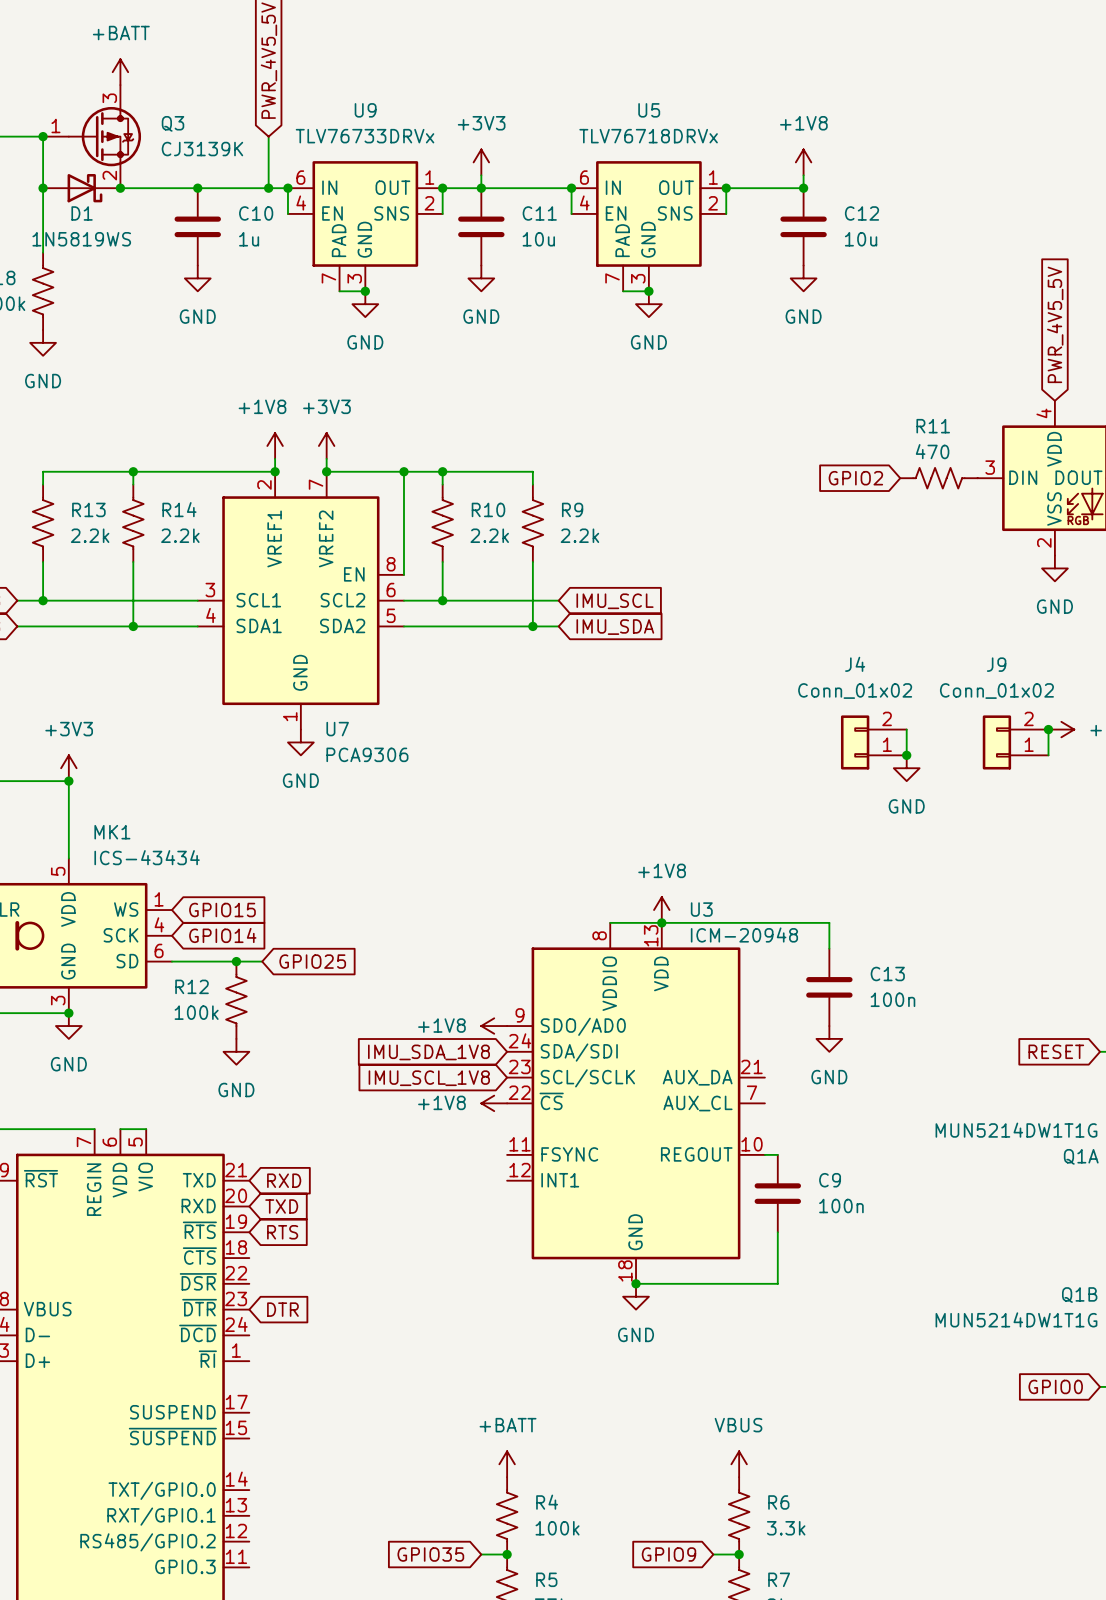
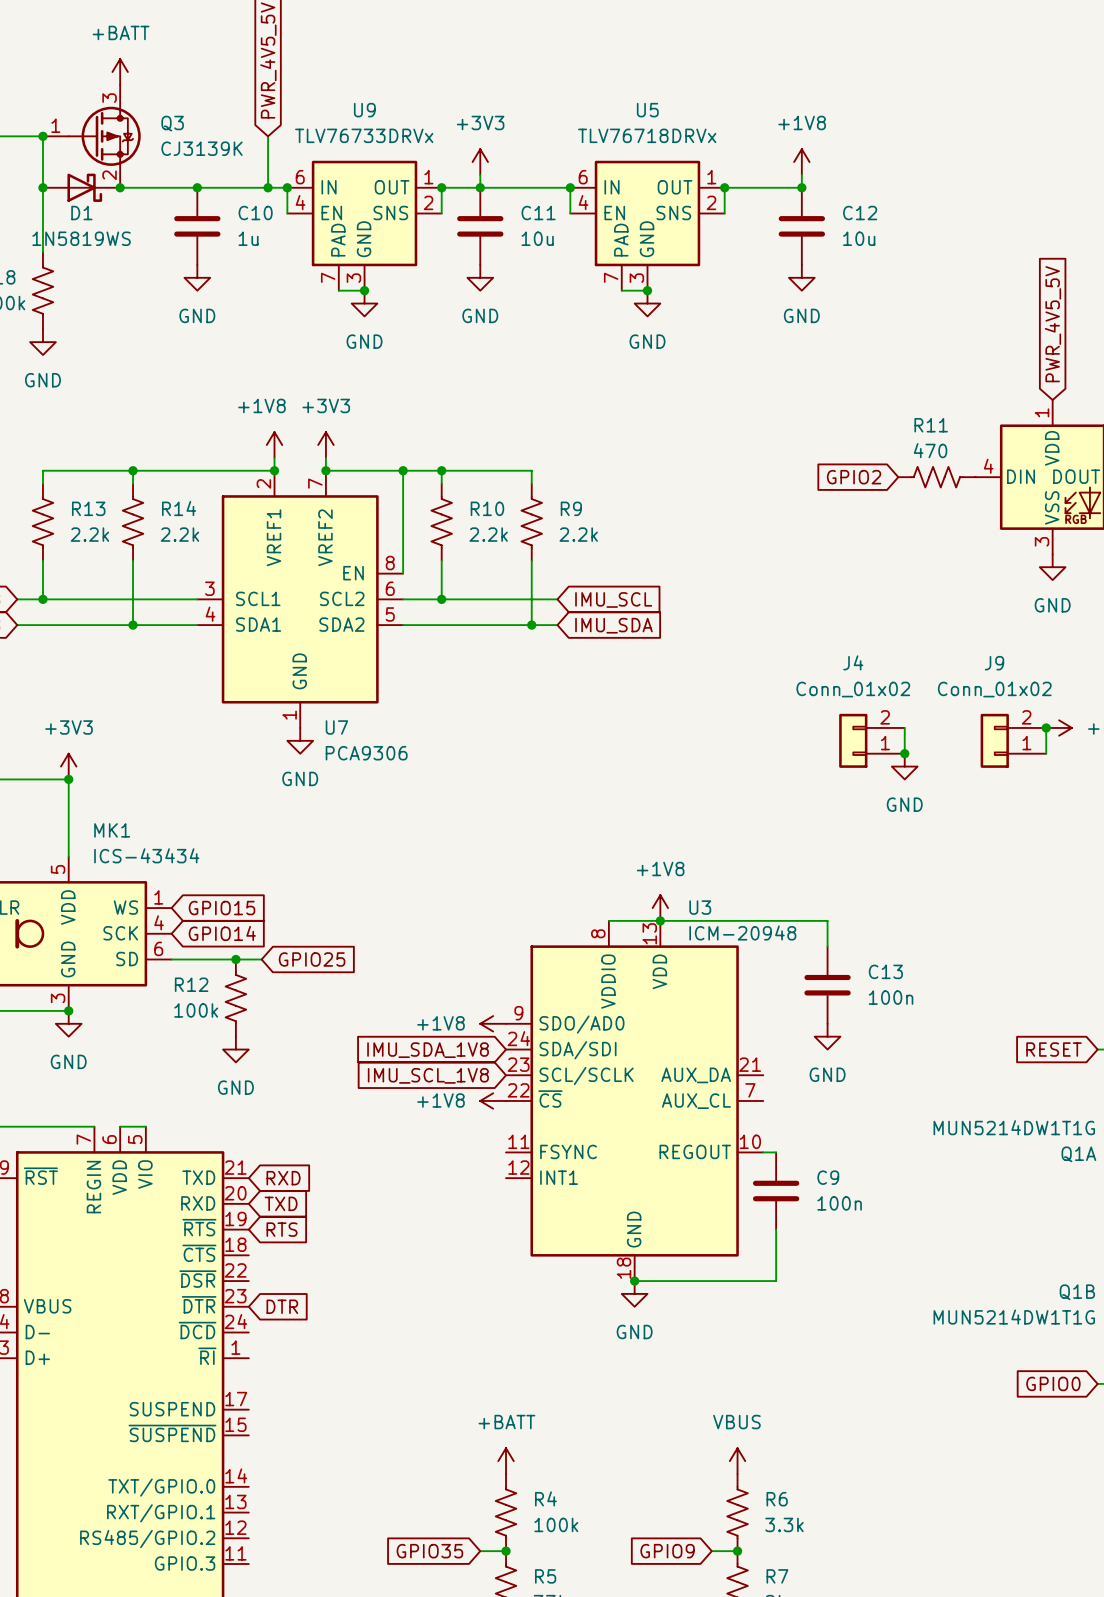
part pin number: 4 (1044, 413) -> 1 (1042, 412)
part pin number: 3 (990, 467) -> 4 (988, 466)
part pin number: 2 (1044, 542) -> 3 (1042, 541)

